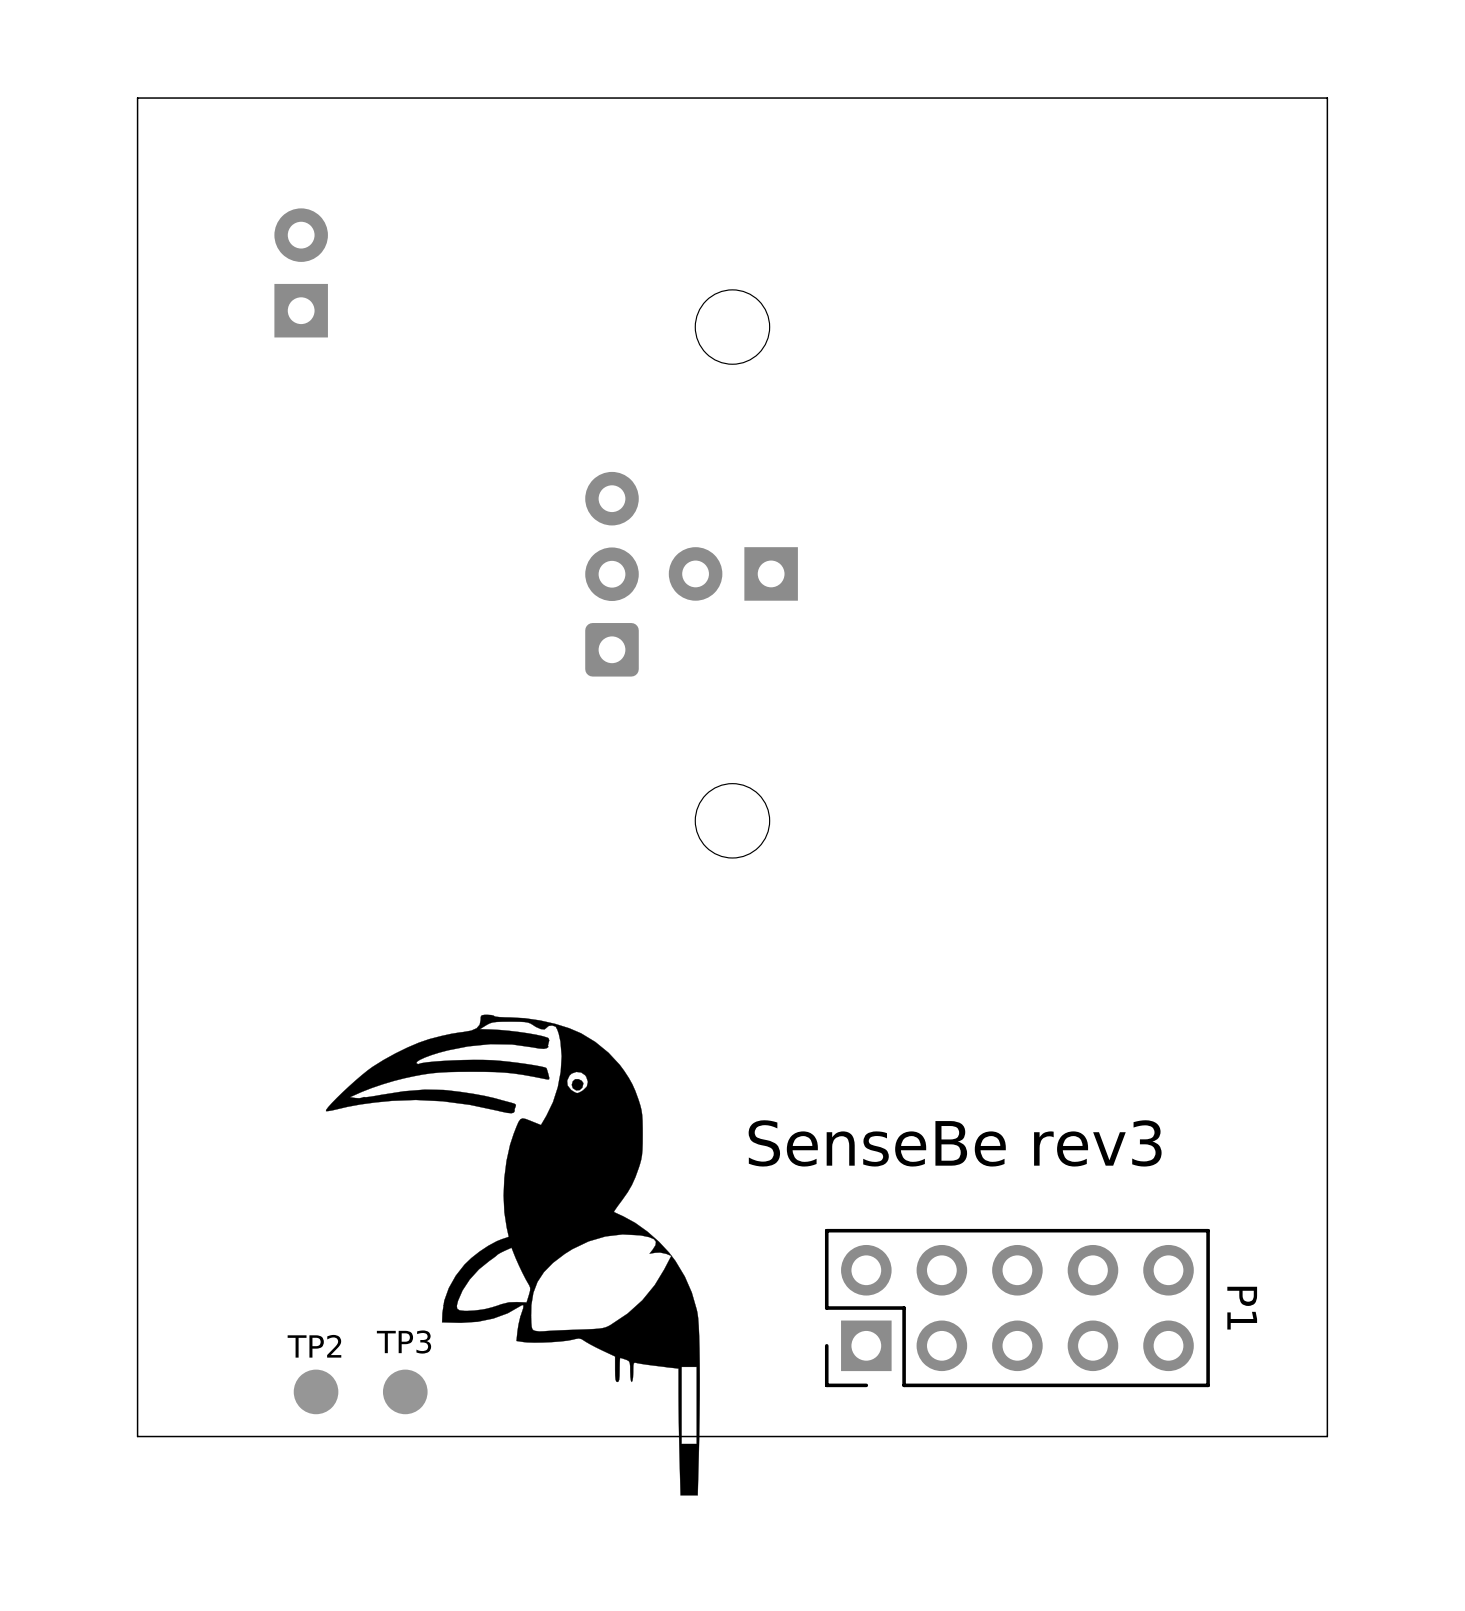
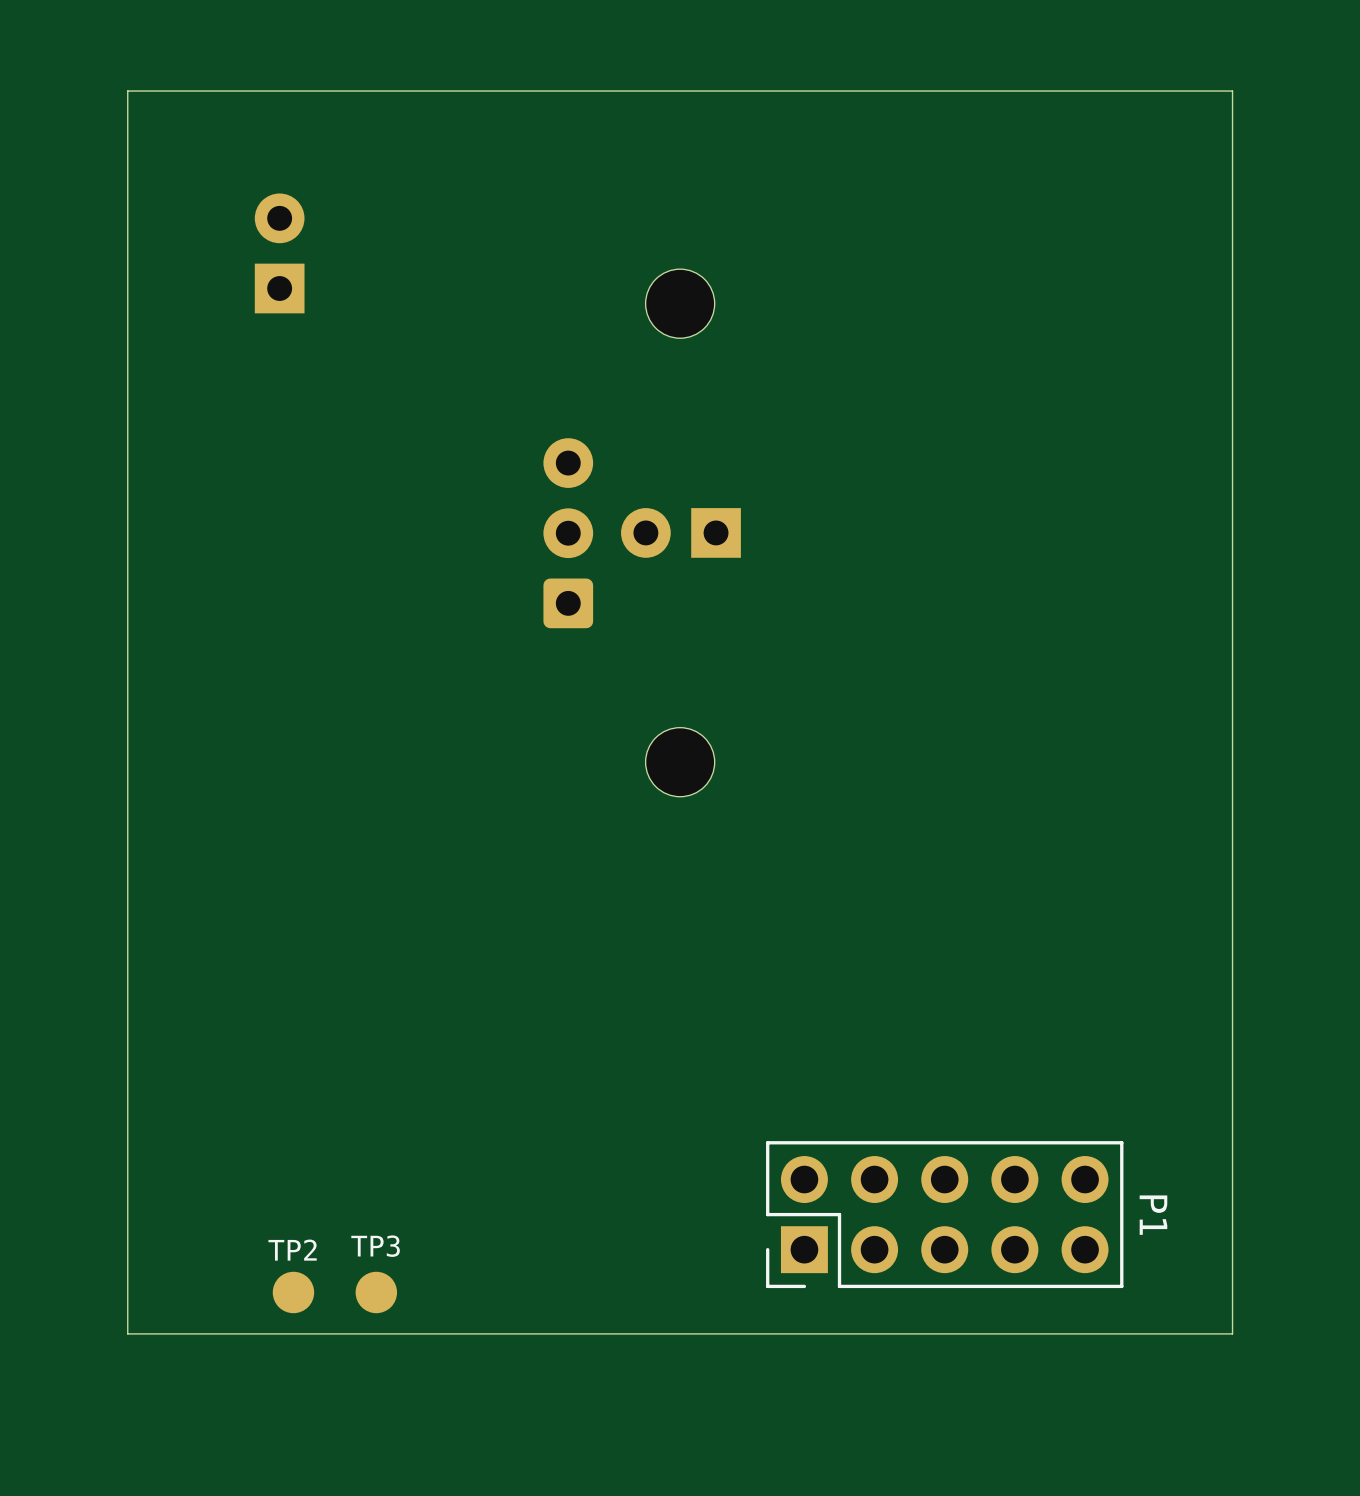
drawing: [325, 1014, 700, 1496] -> none
text: SenseBe rev3 (955, 1143) -> none

